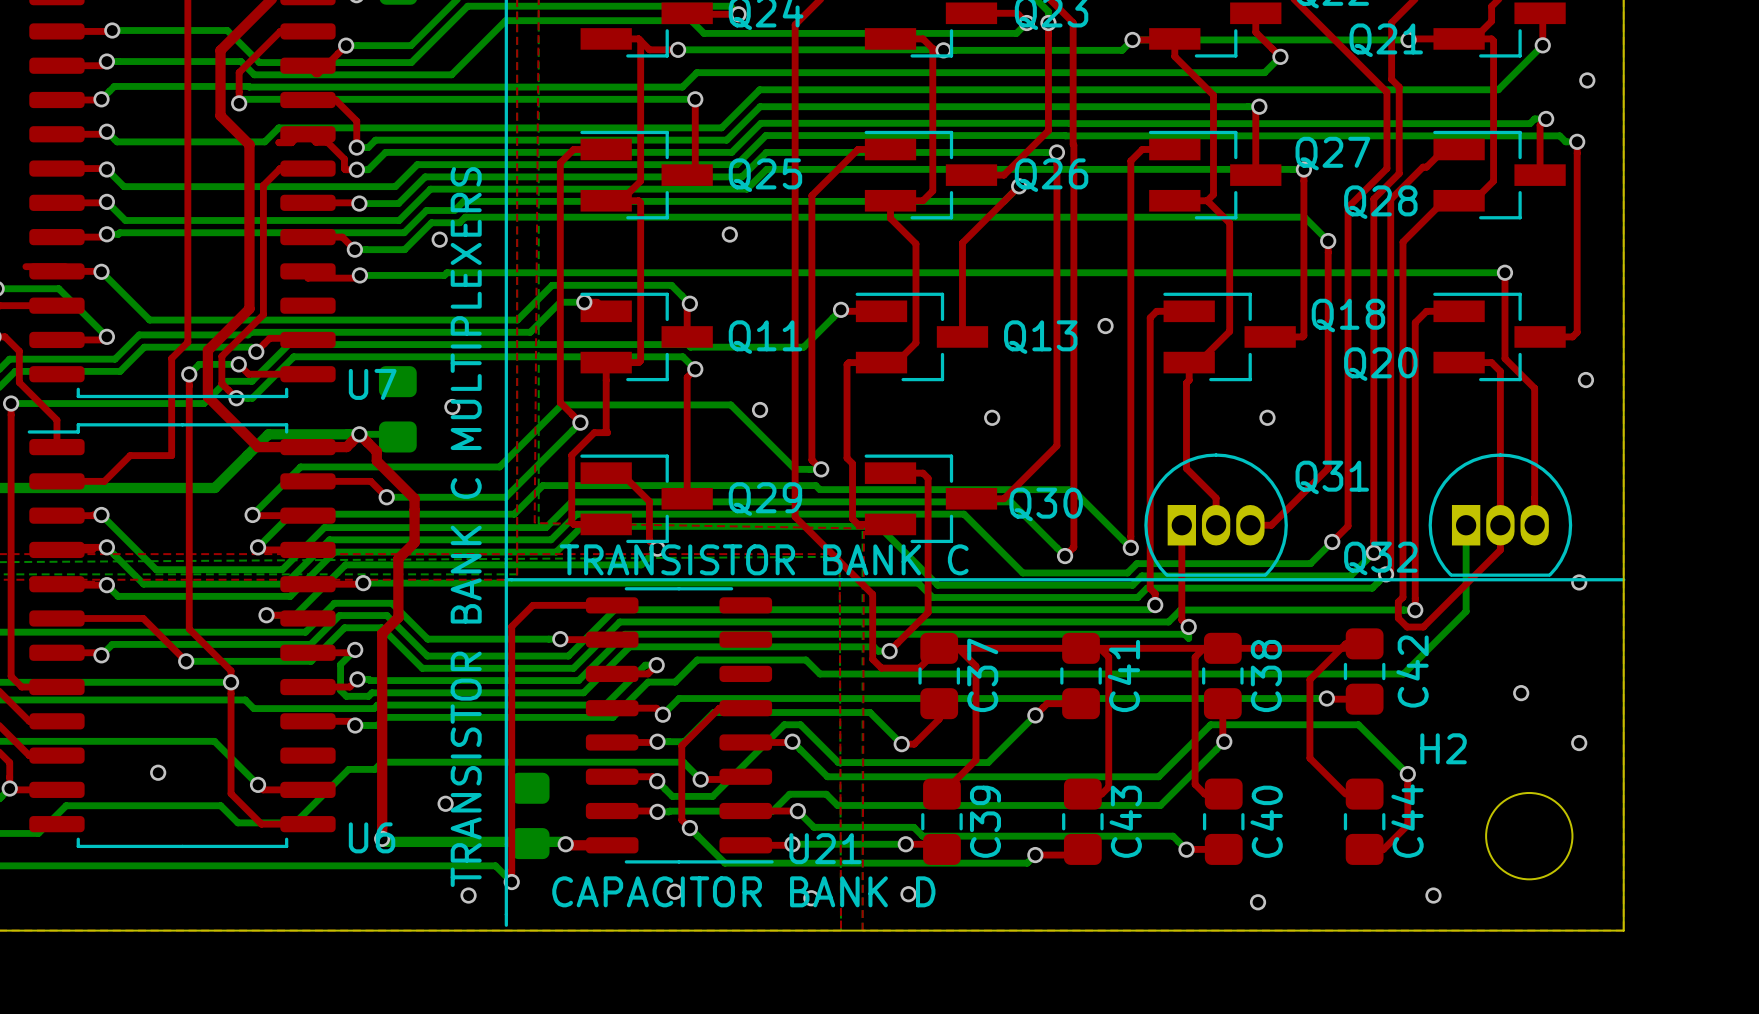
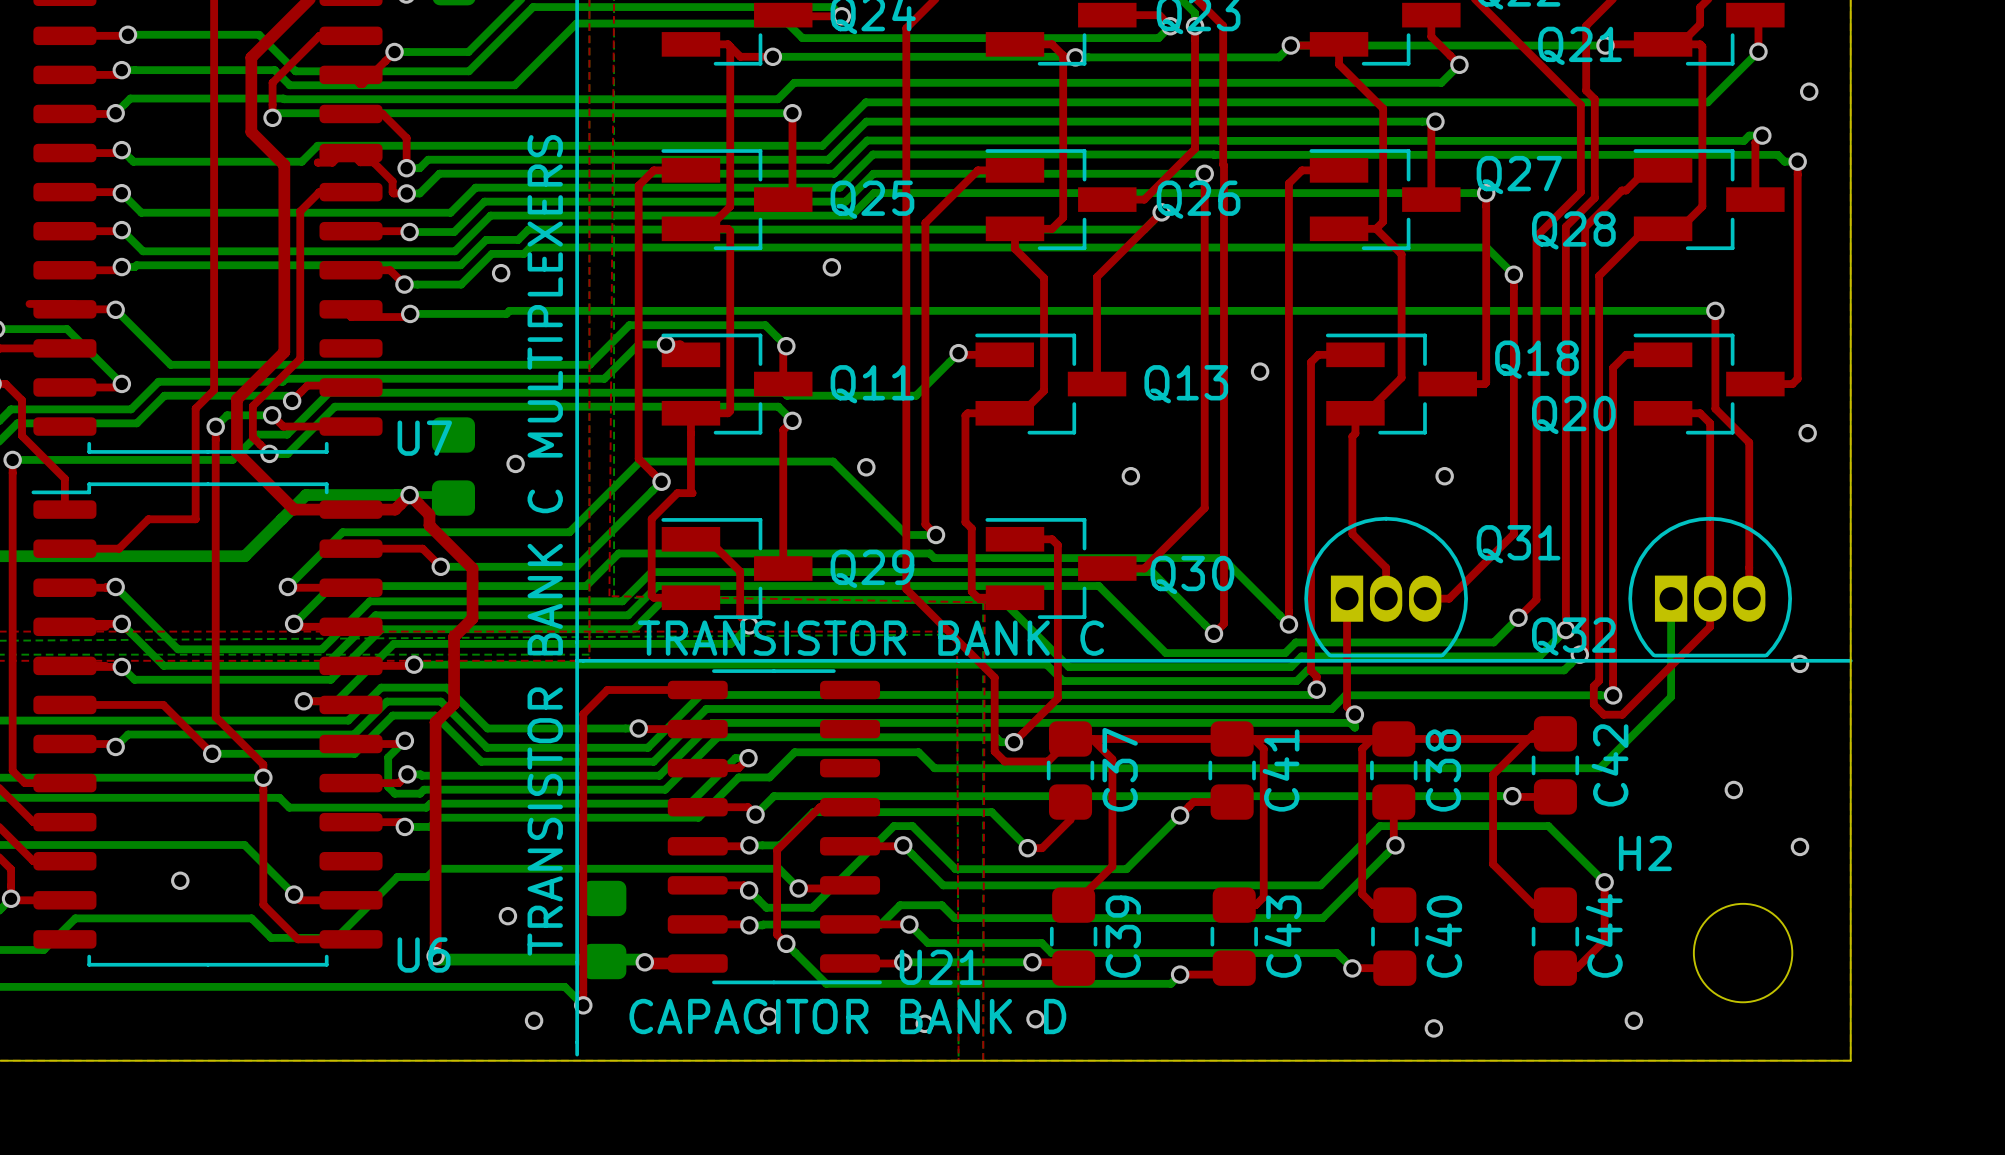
text position: TRANSISTOR BANK C MULTIPLEXERS (466, 527) -> TRANSISTOR BANK C MULTIPLEXERS (545, 545)

